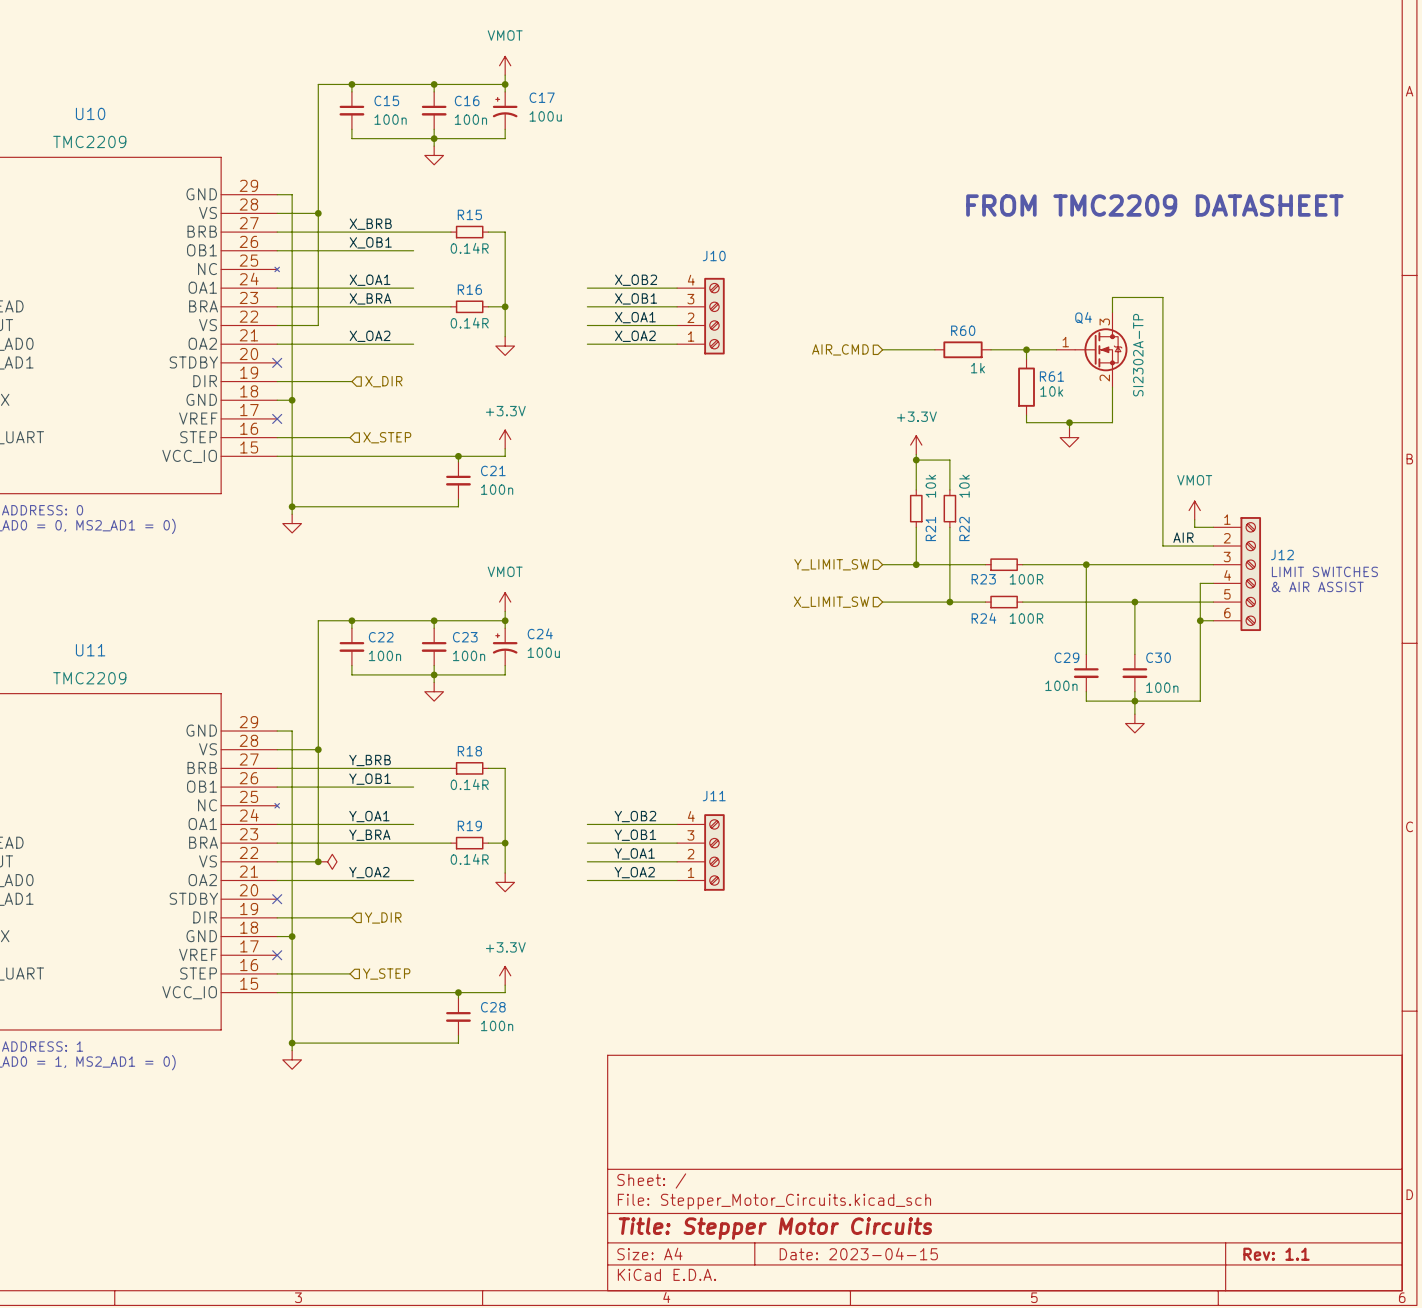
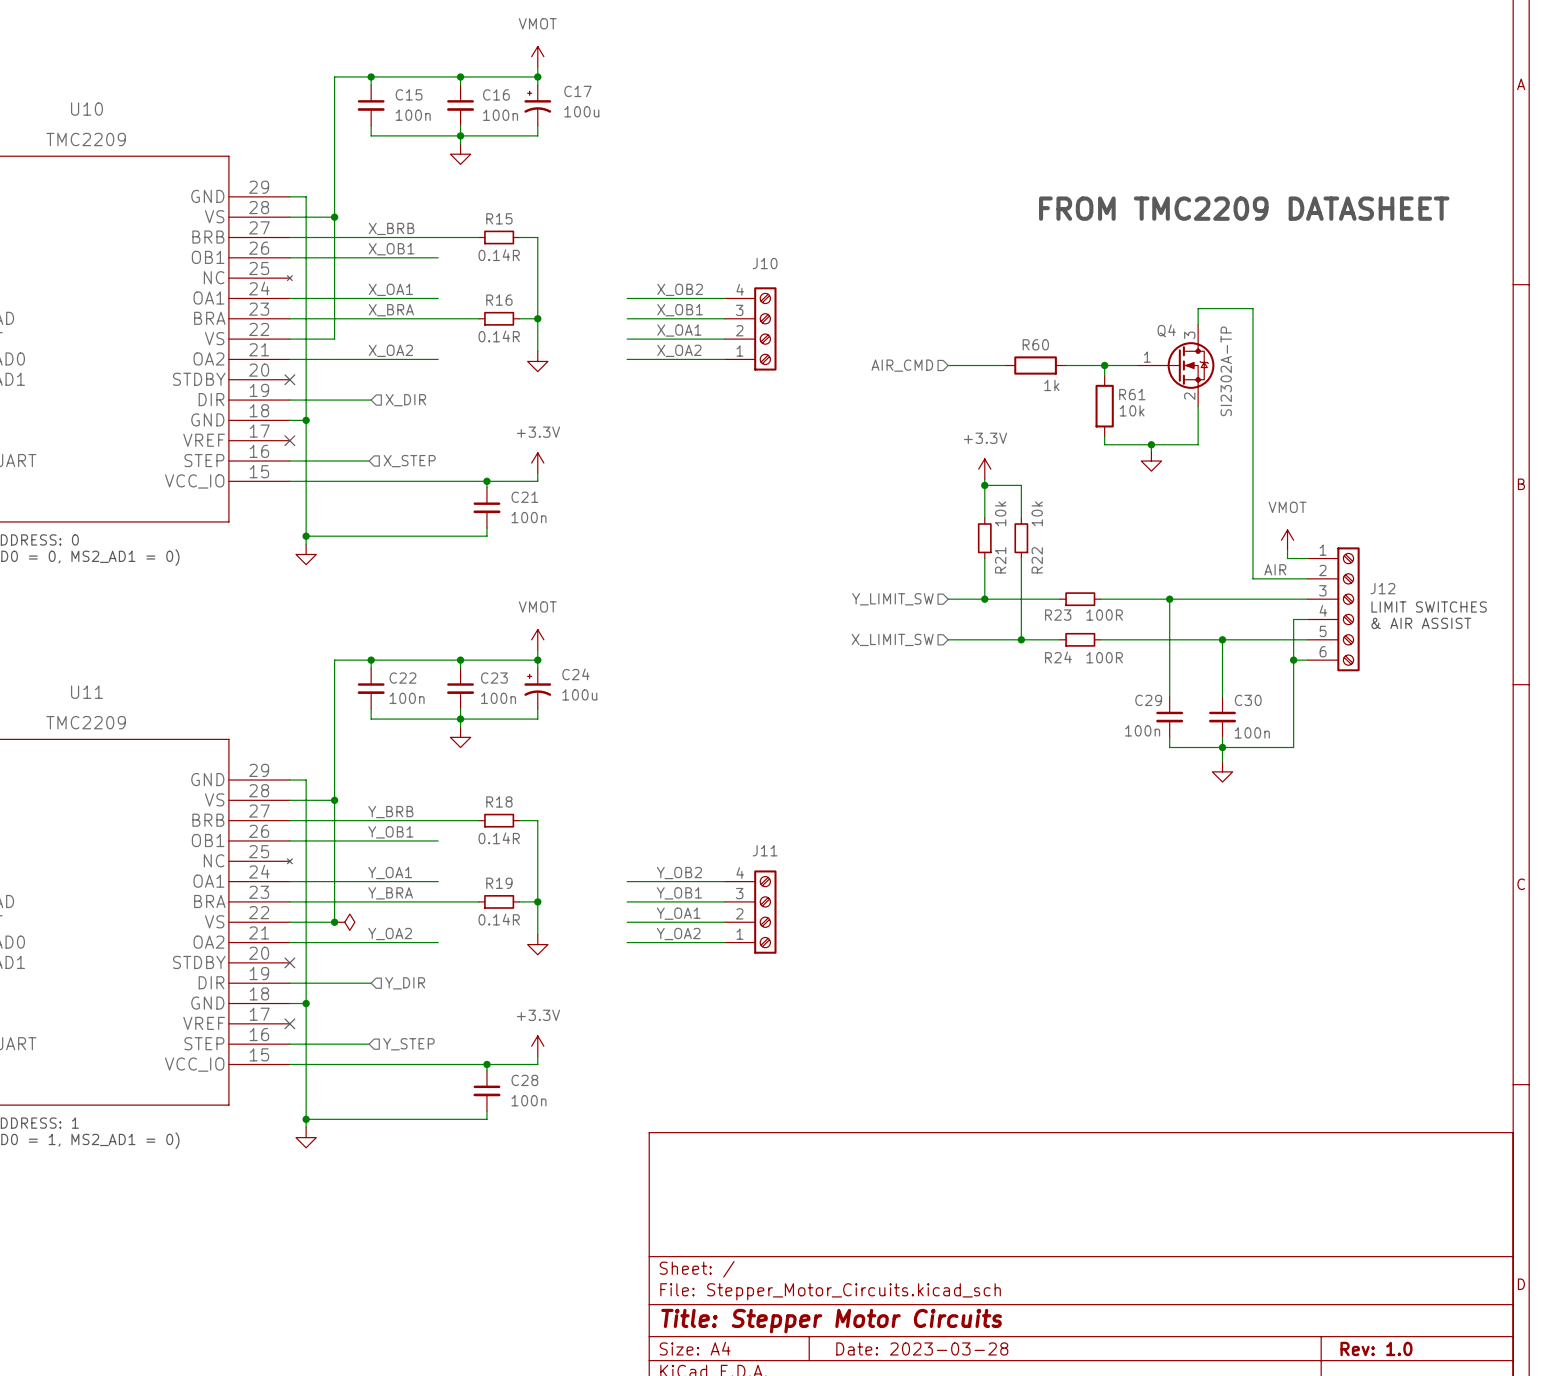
title block: Date: 2023-04-15 (858, 1253) -> Date: 2023-03-28 (922, 1348)
title block: Rev: 1.1 (1276, 1254) -> Rev: 1.0 (1376, 1348)

